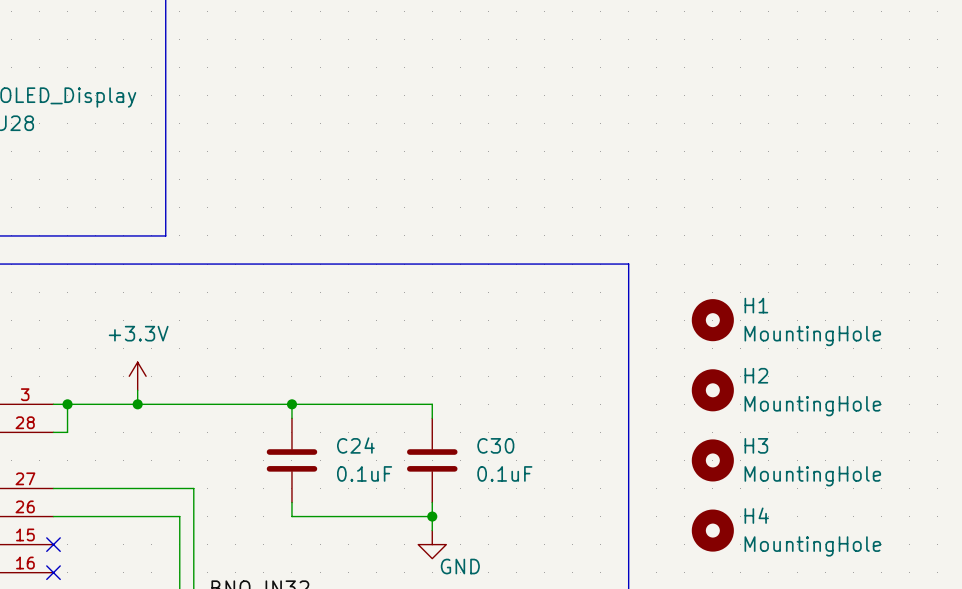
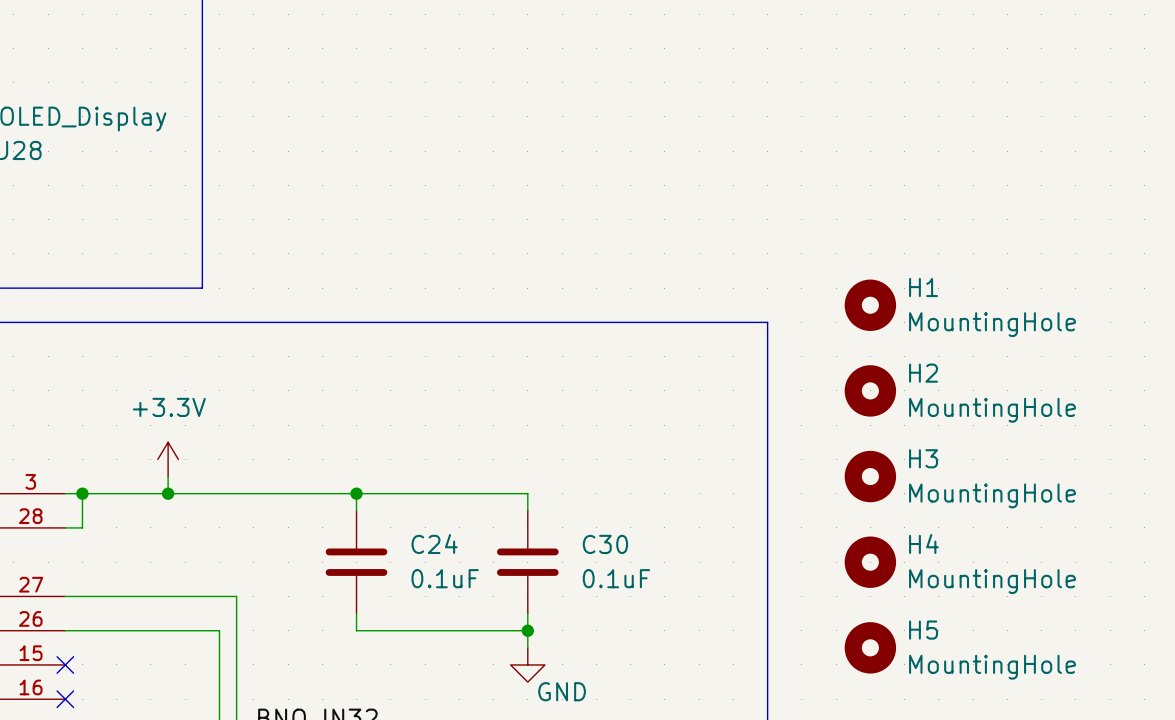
H1: none -> MountingHole (870, 305)
H1 name: H1 (756, 305) -> H2 (923, 373)
H2 name: H2 (756, 375) -> H3 (923, 458)
H3 name: H3 (756, 445) -> H4 (923, 544)
H4 name: H4 (756, 515) -> H5 (923, 630)

